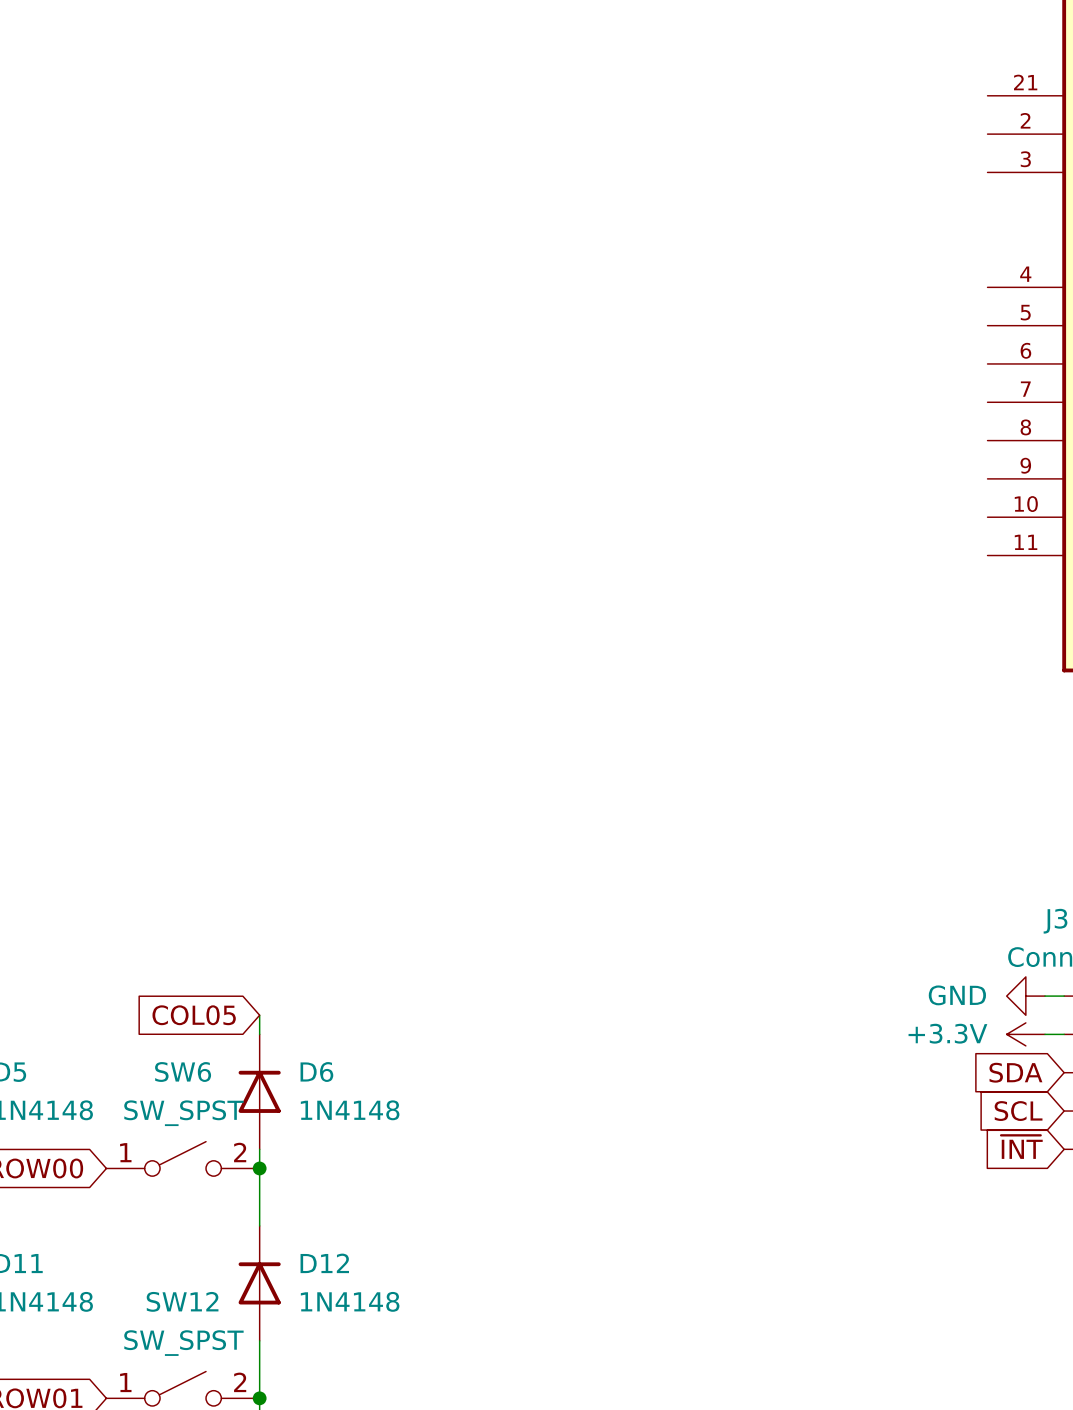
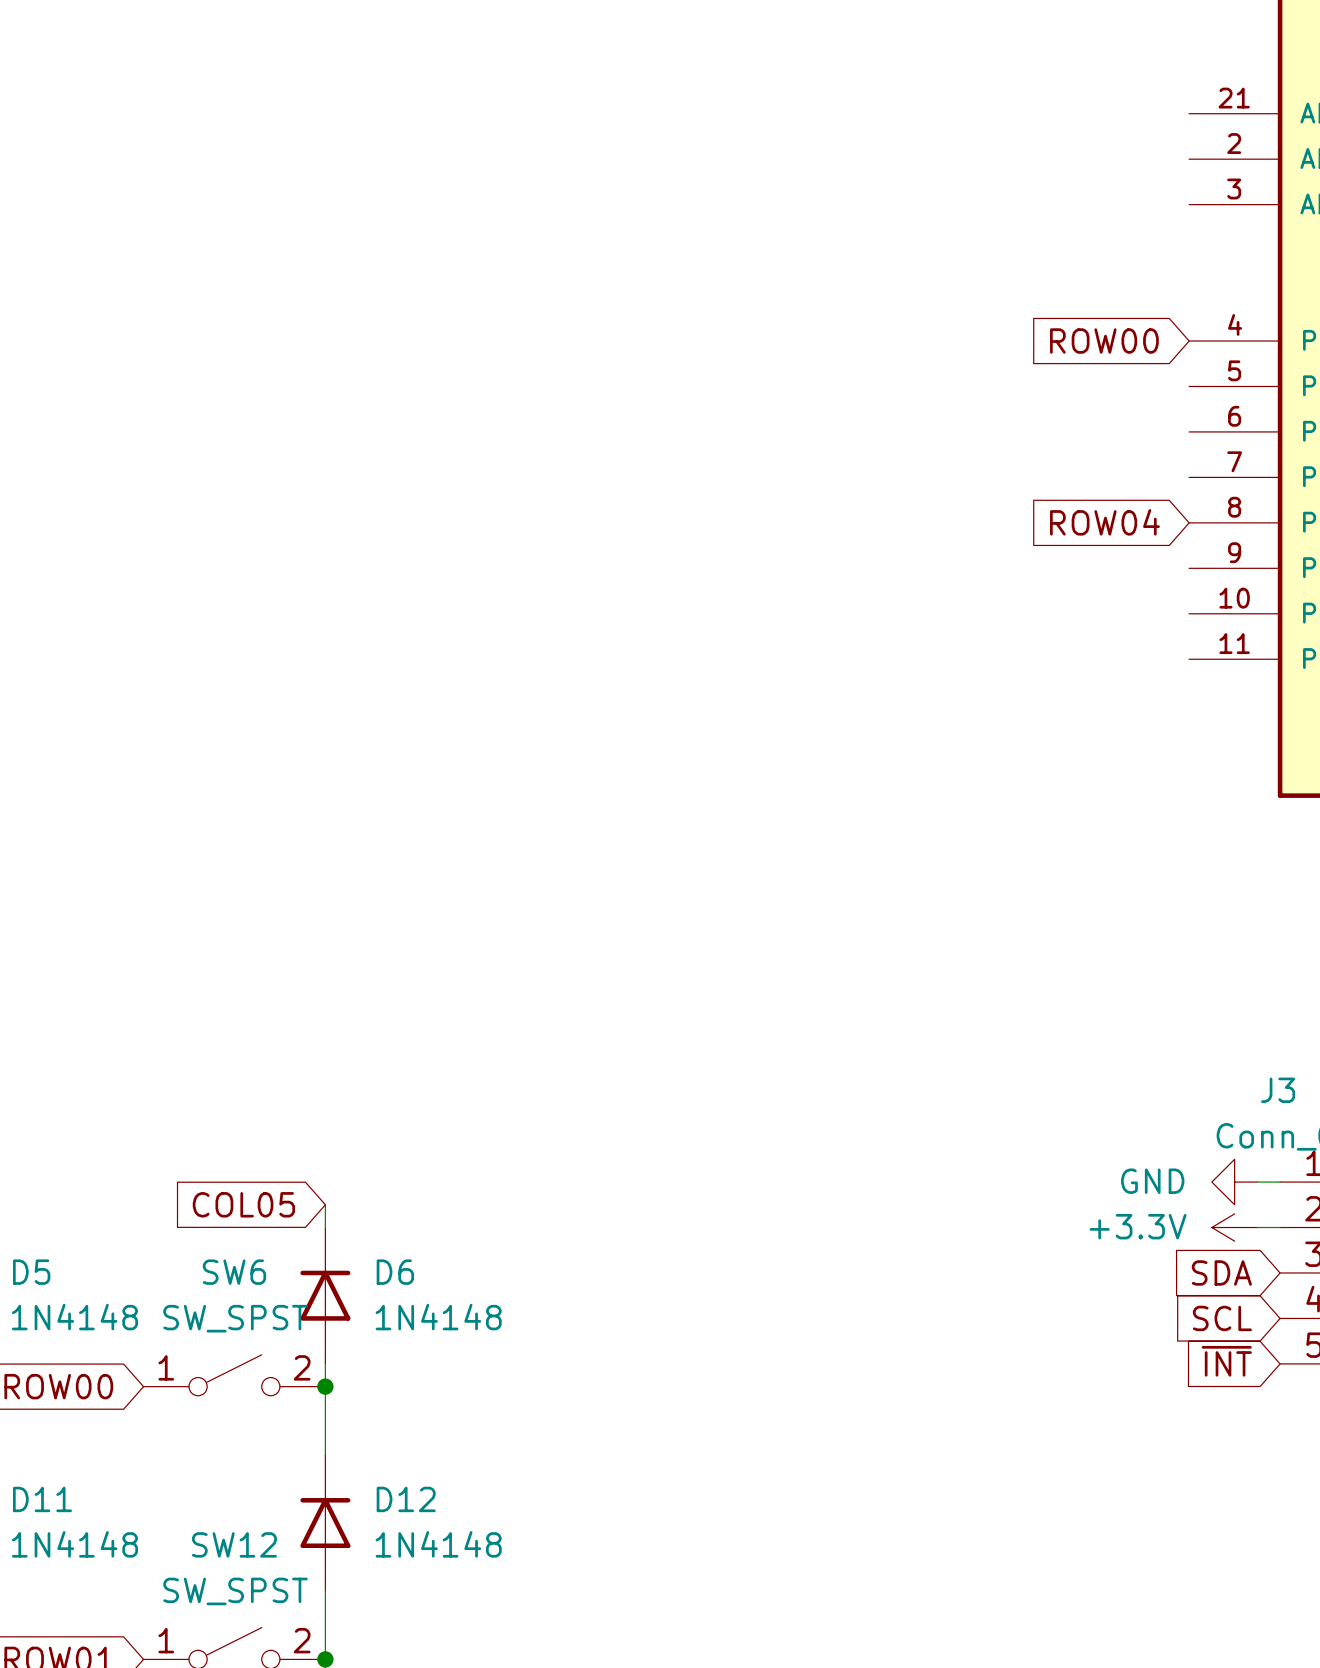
global label: none -> ROW00 (1104, 341)
global label: none -> ROW04 (1104, 522)

